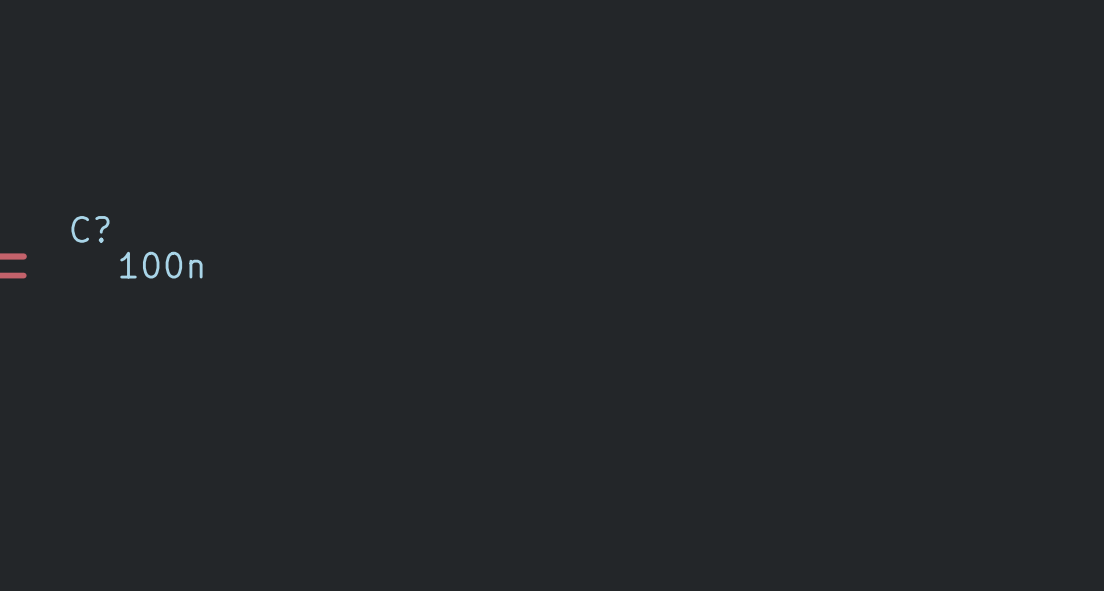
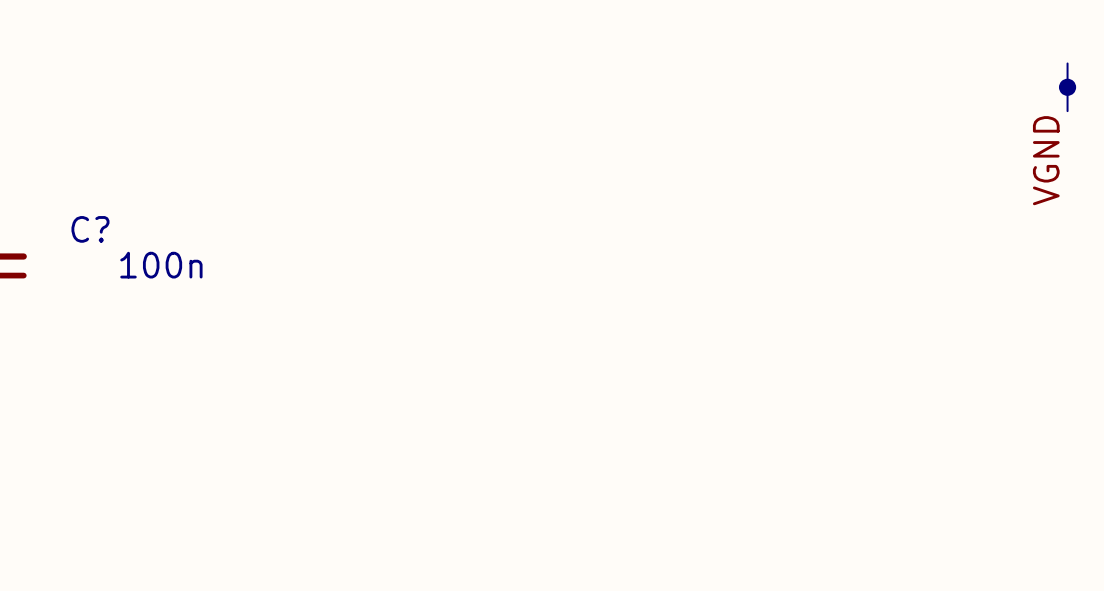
wire: none -> (1067, 63) (1067, 111)
junction: none -> (1067, 87)
label: none -> VGND (1046, 160)

